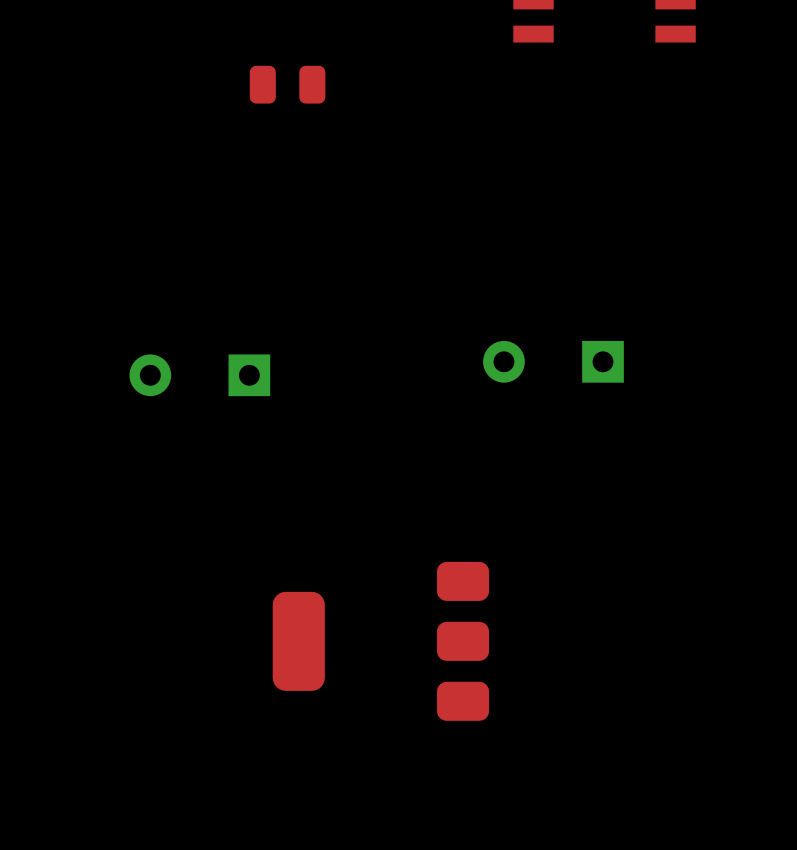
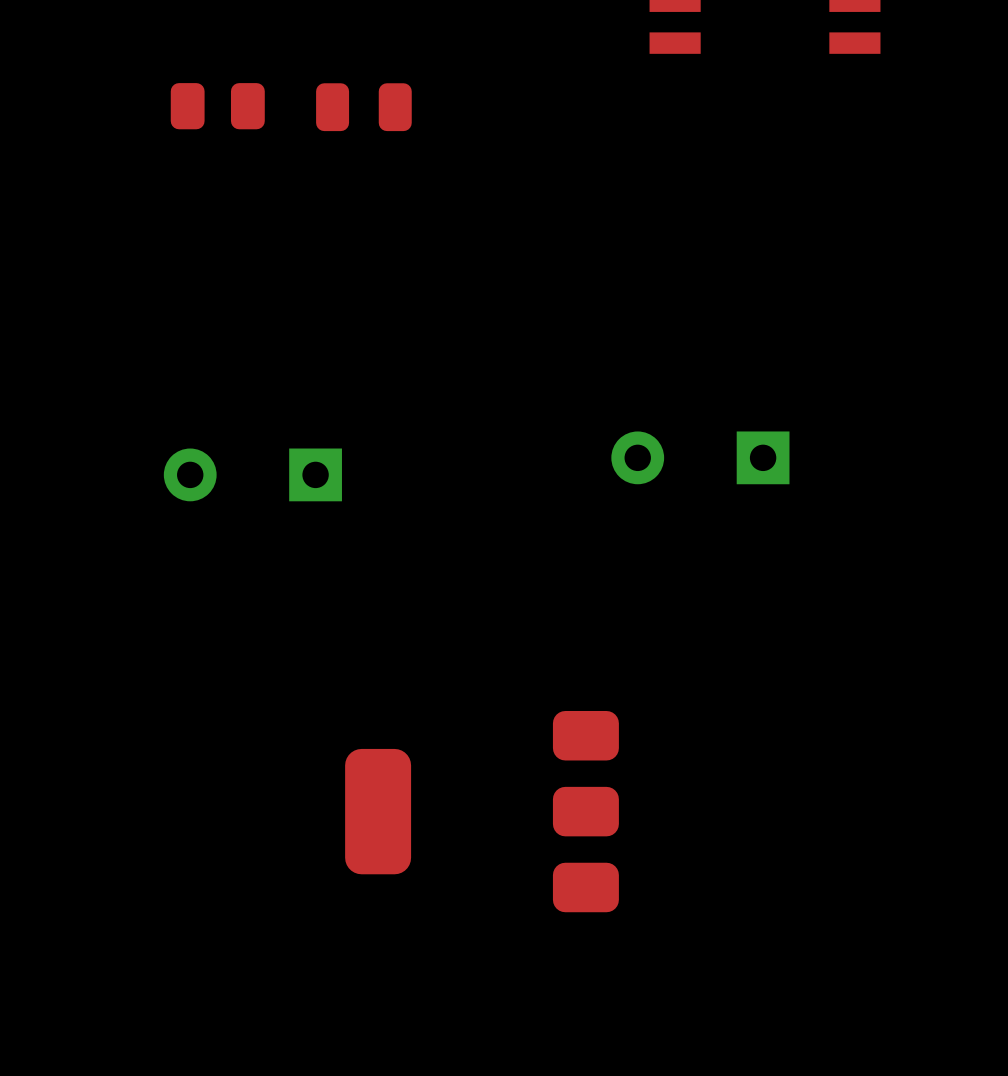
part: none -> (217, 106)

